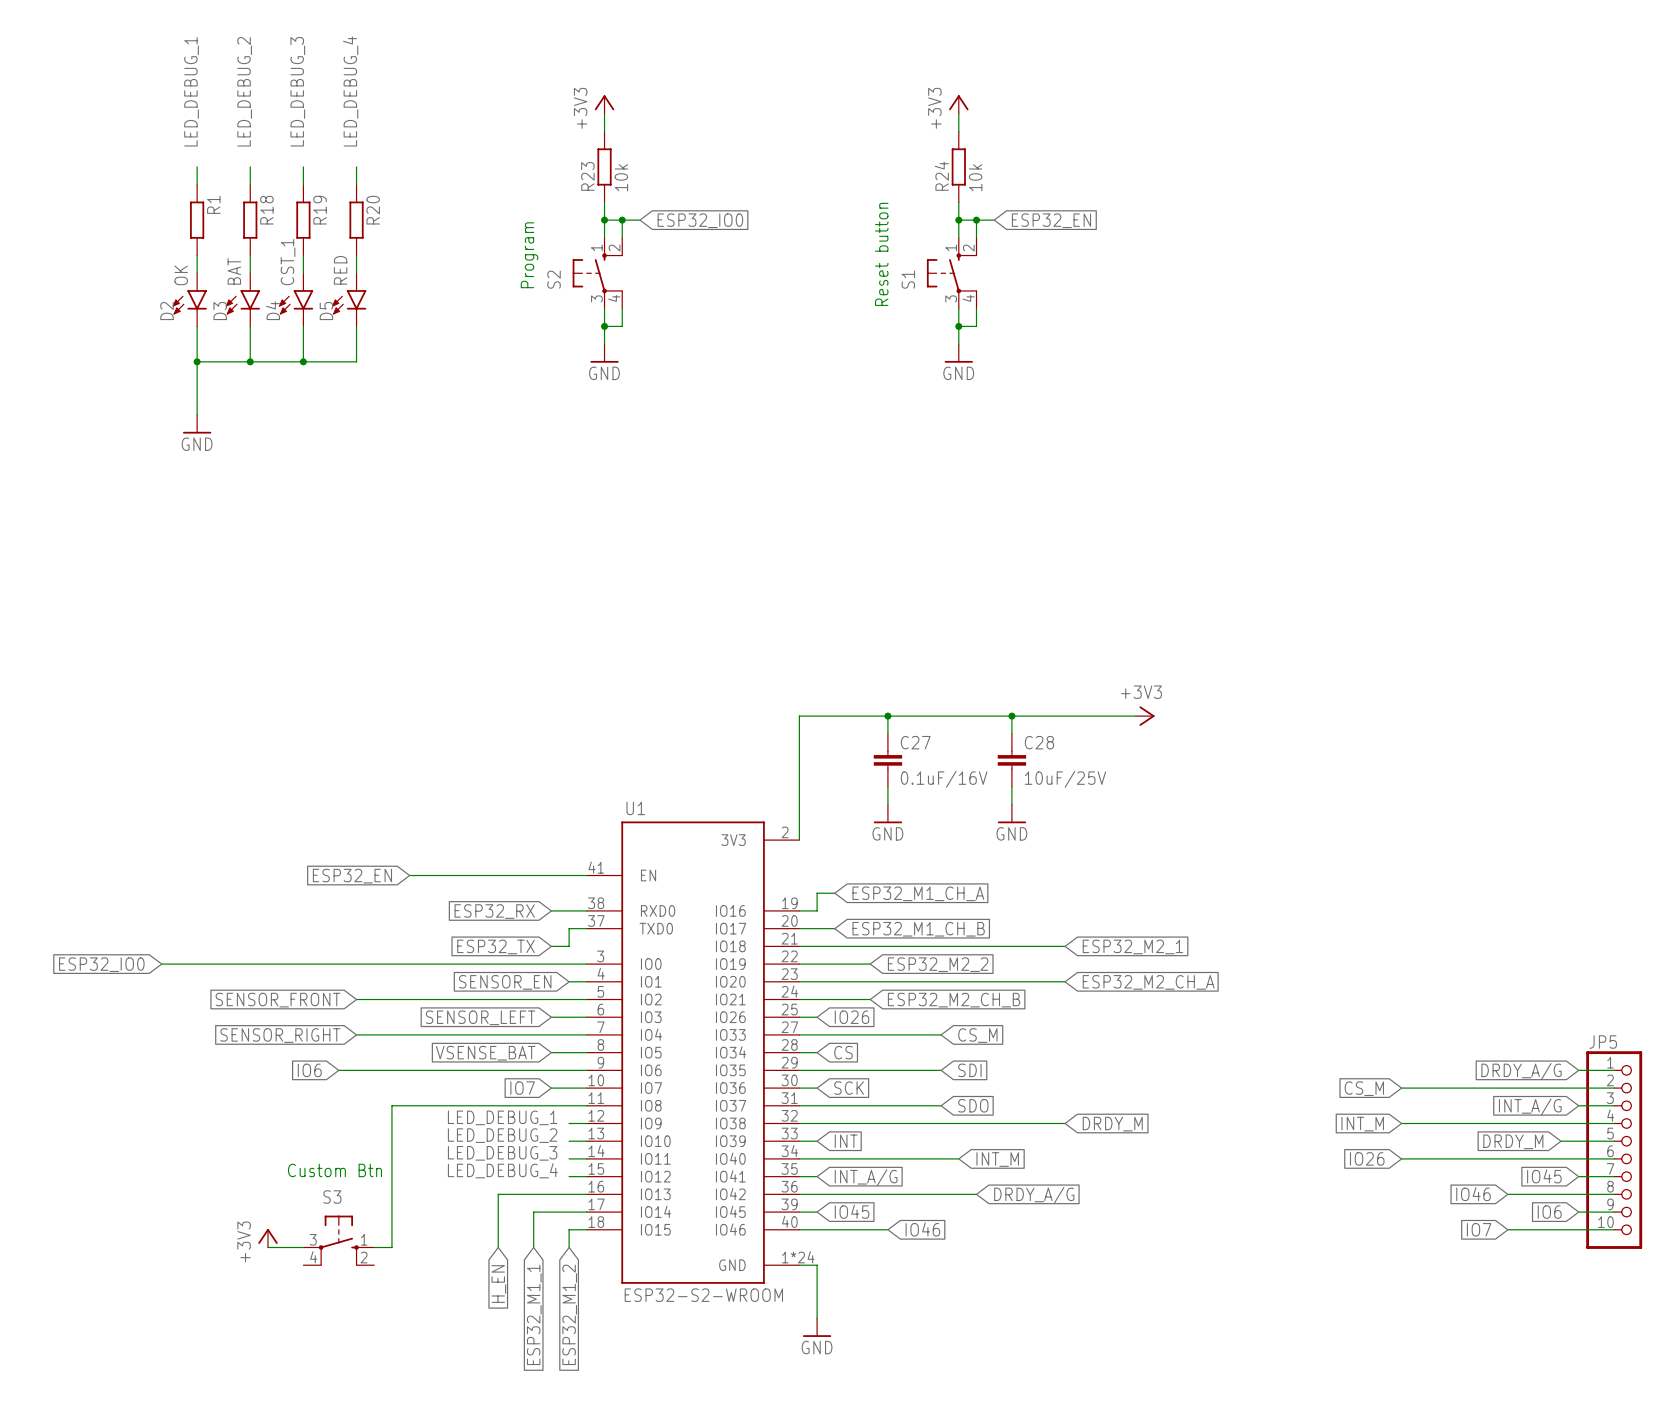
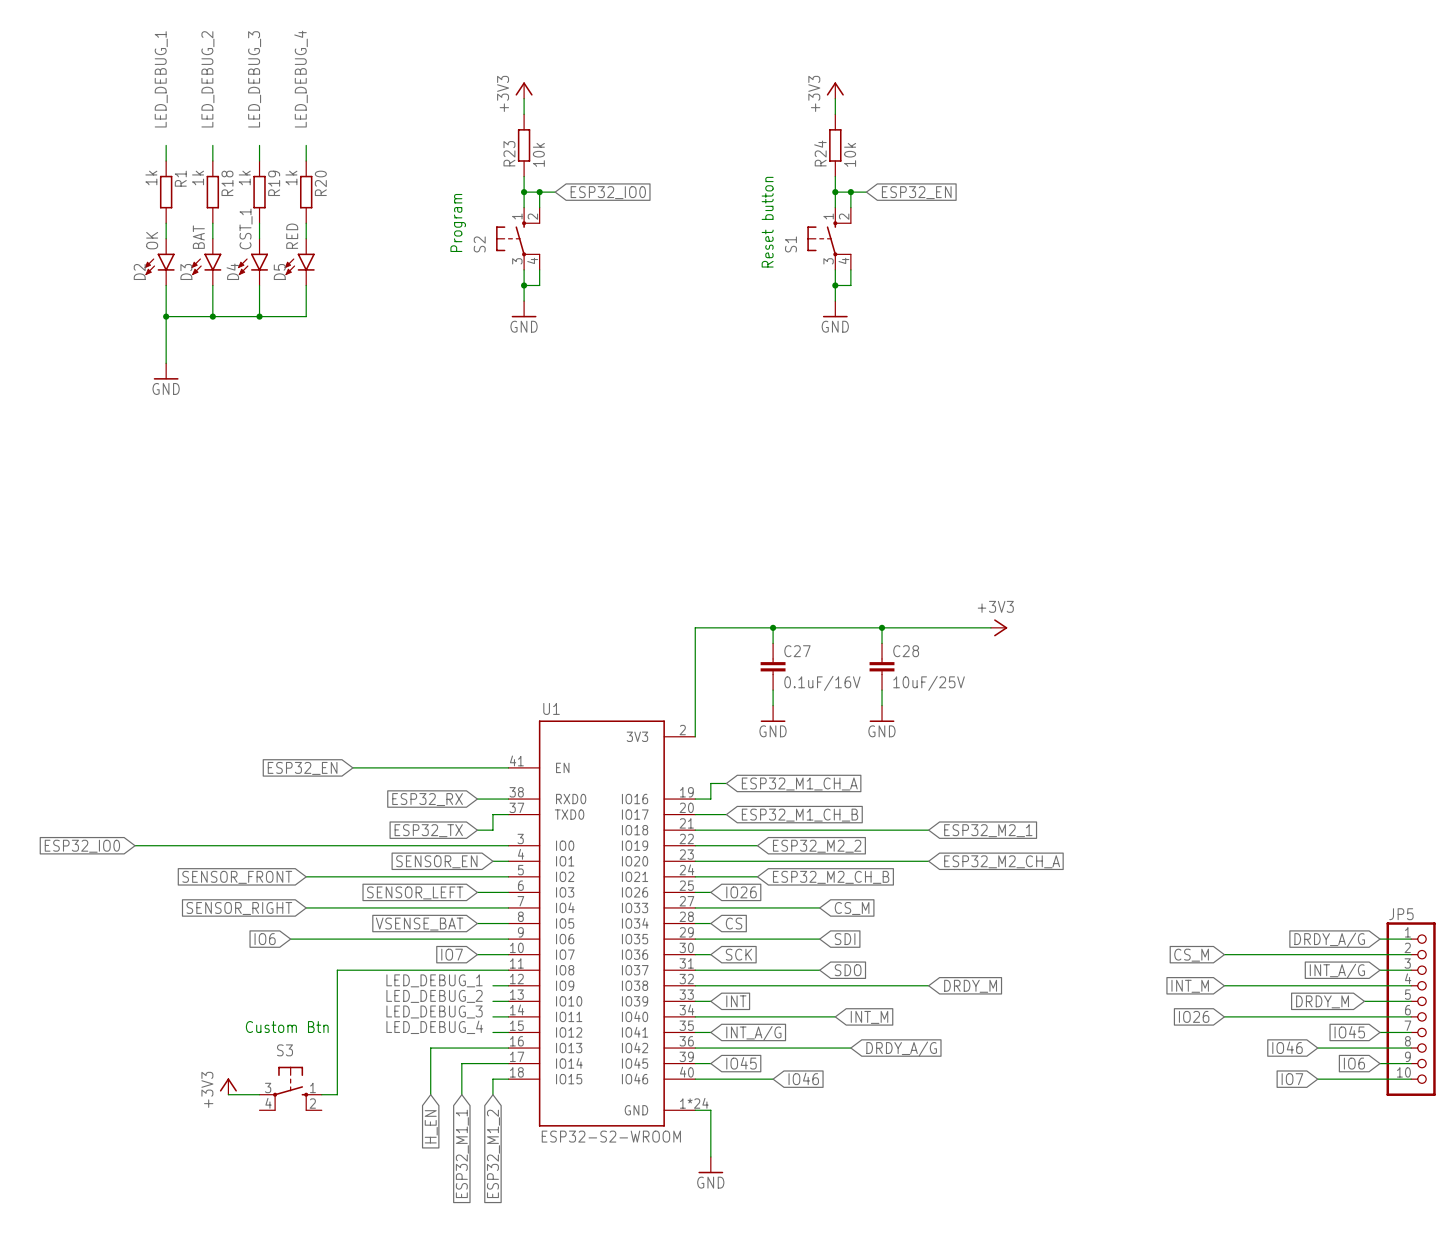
R1 value: none -> 1k (151, 177)
R18 value: none -> 1k (198, 177)
R19 value: none -> 1k (244, 177)
R20 value: none -> 1k (291, 177)

